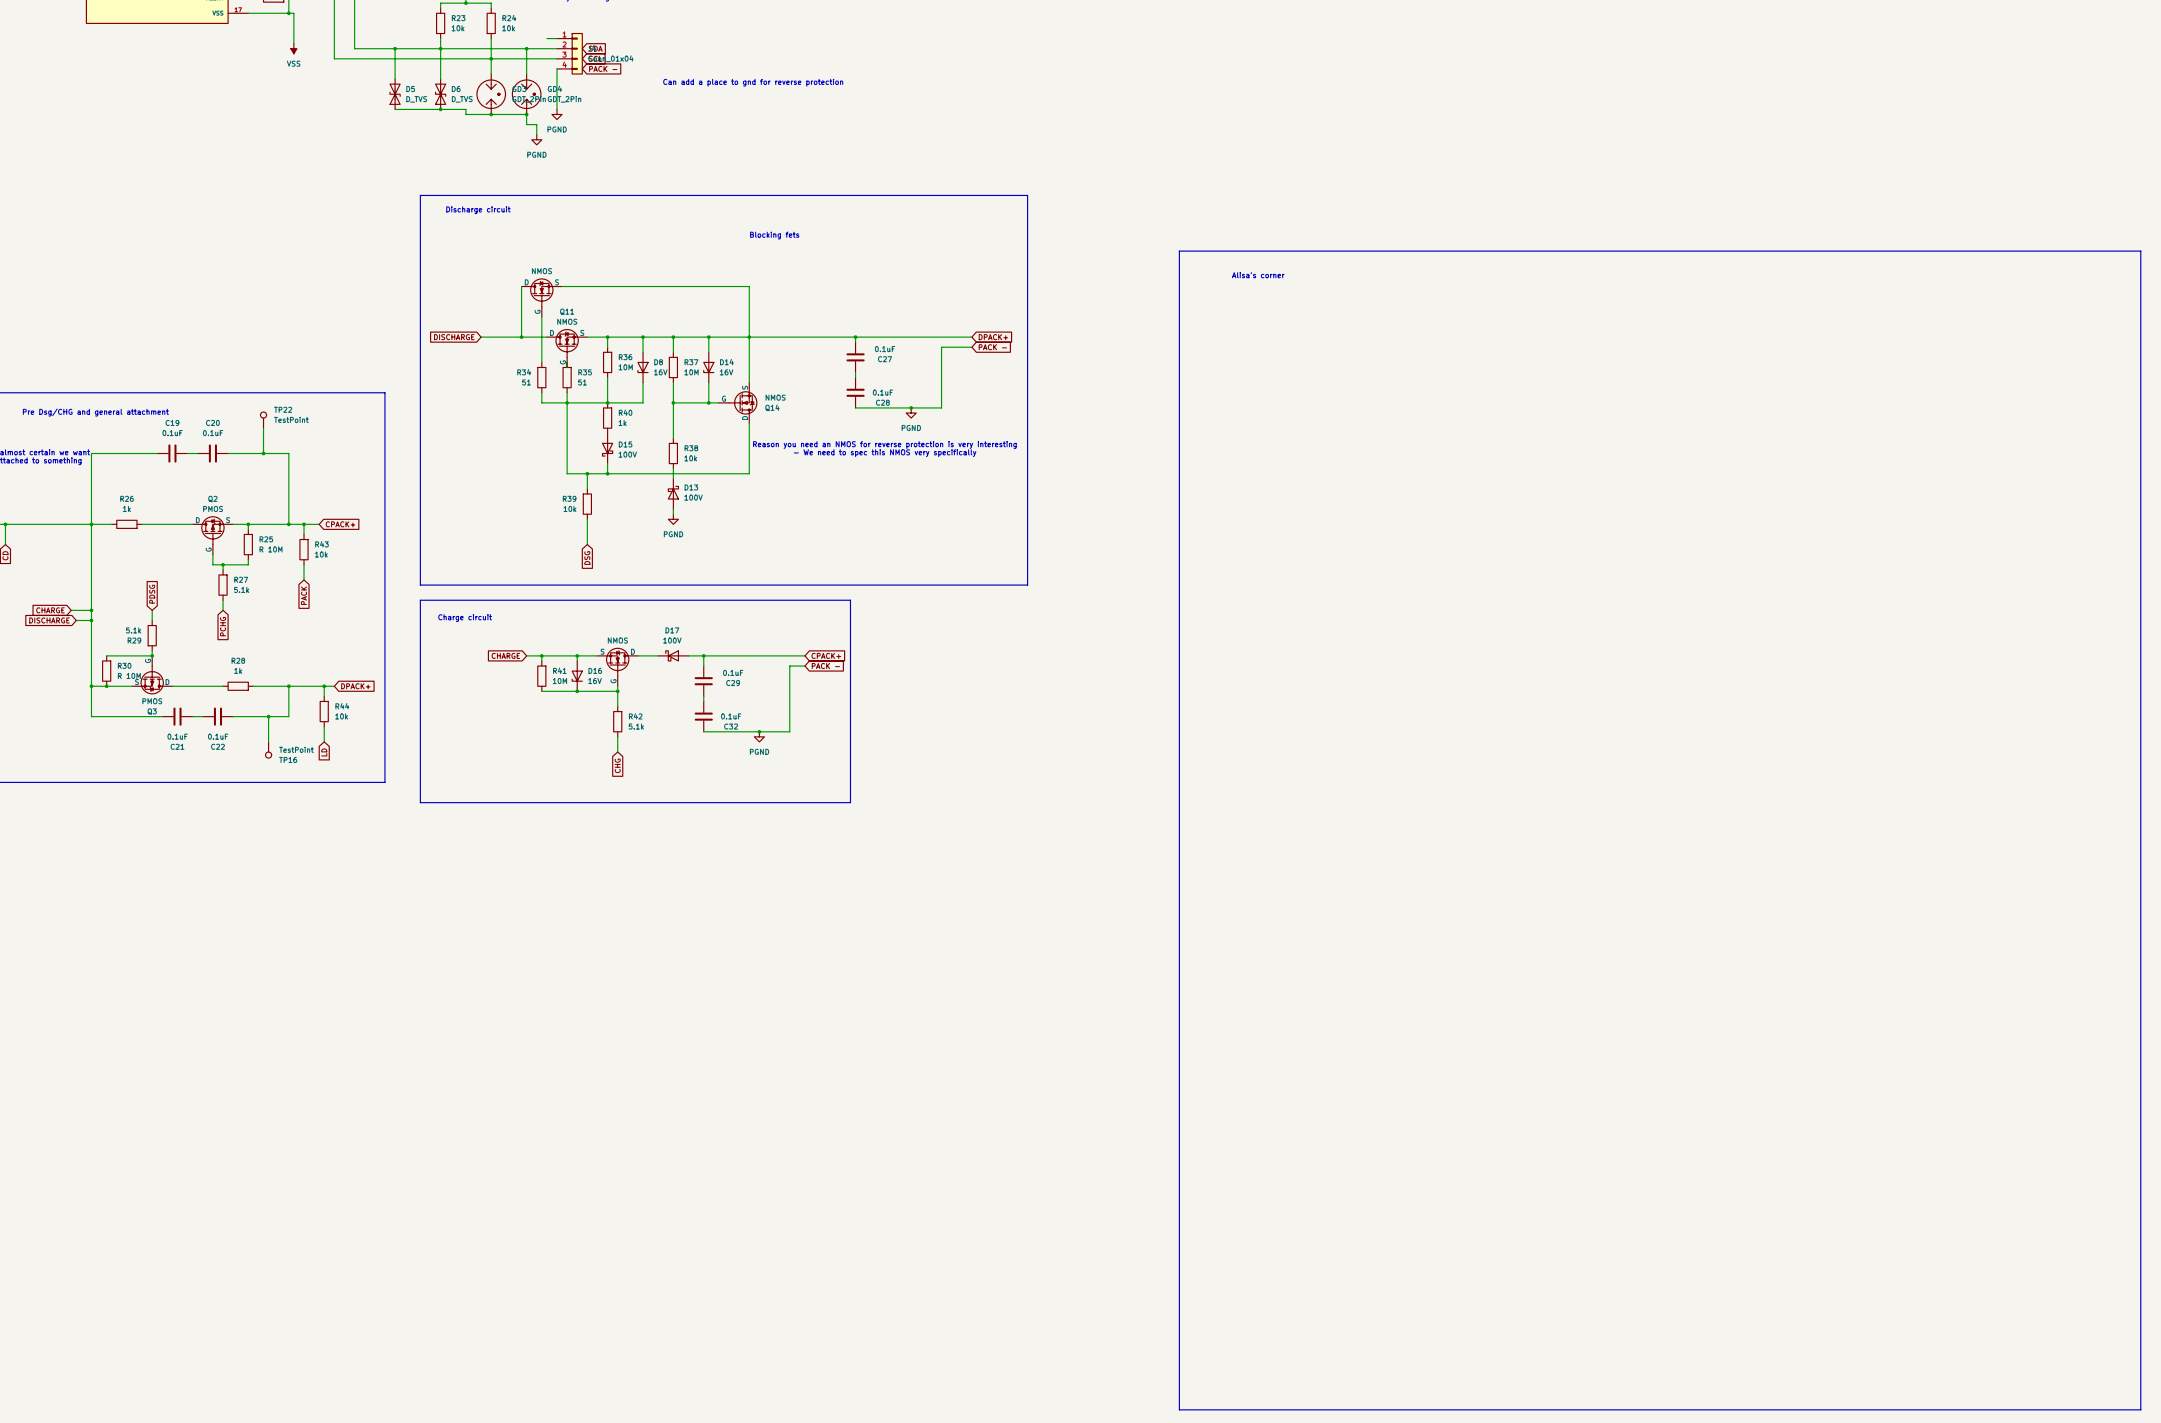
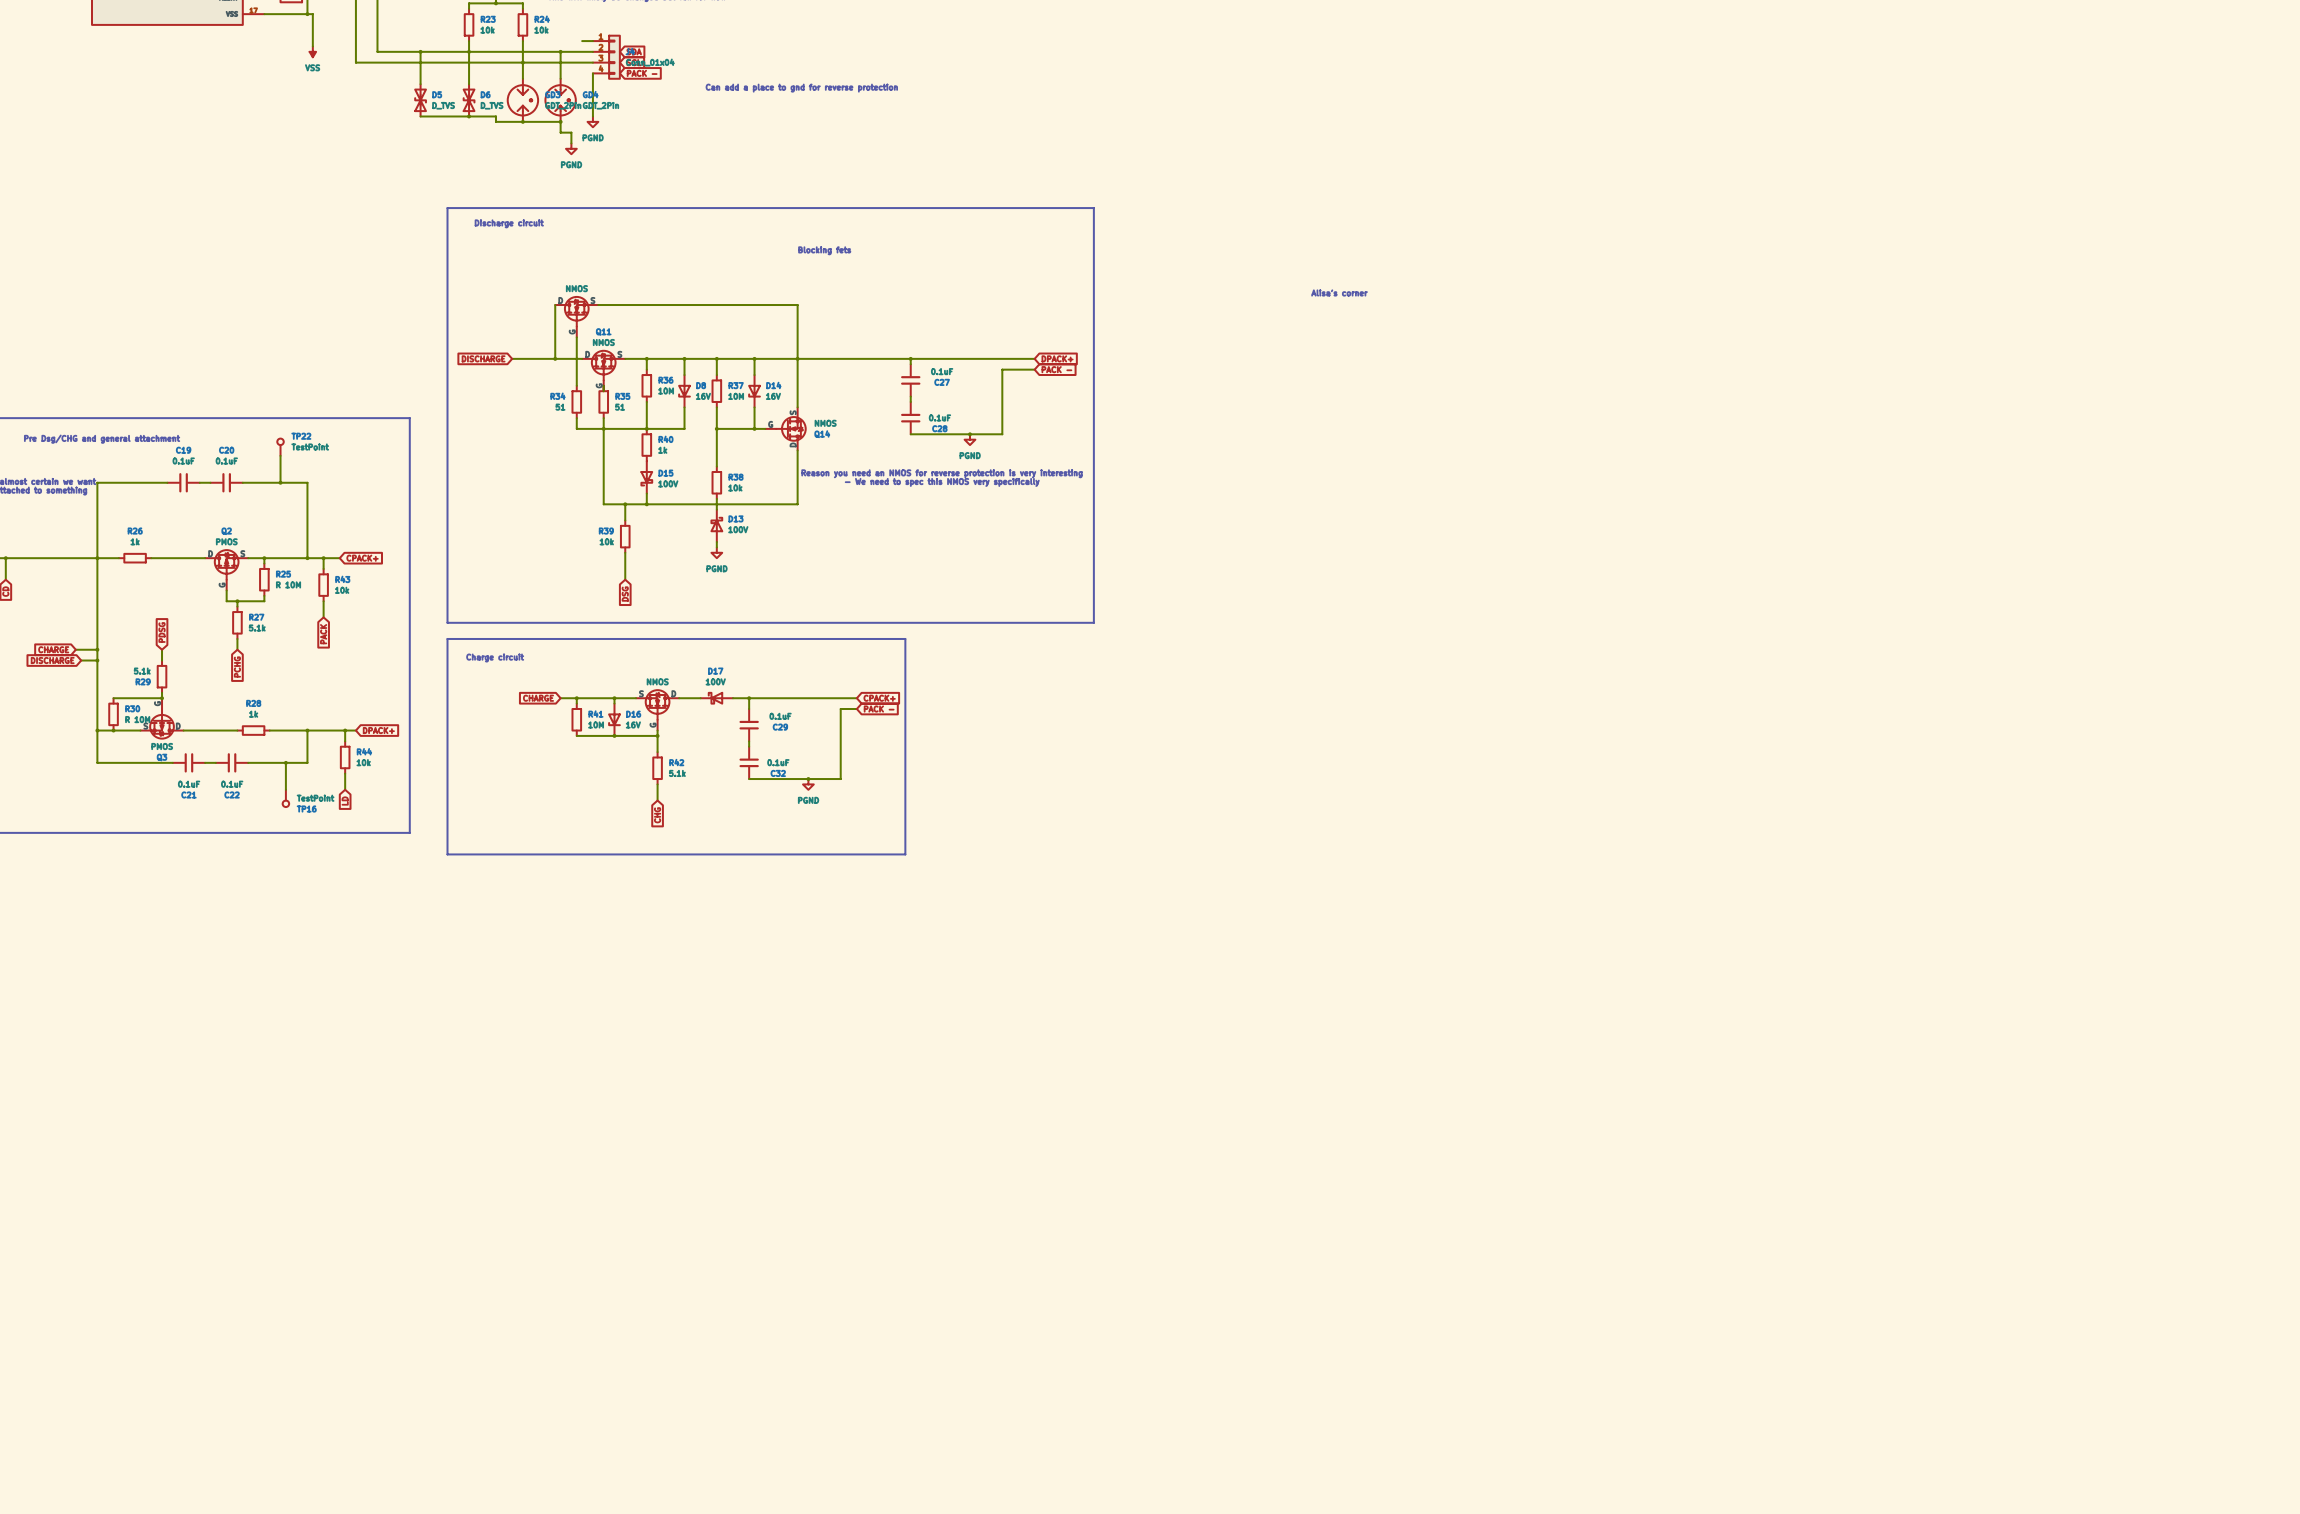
line: (1179, 251) (2140, 251) (2140, 1409) (1179, 1409) (1179, 251) -> none

